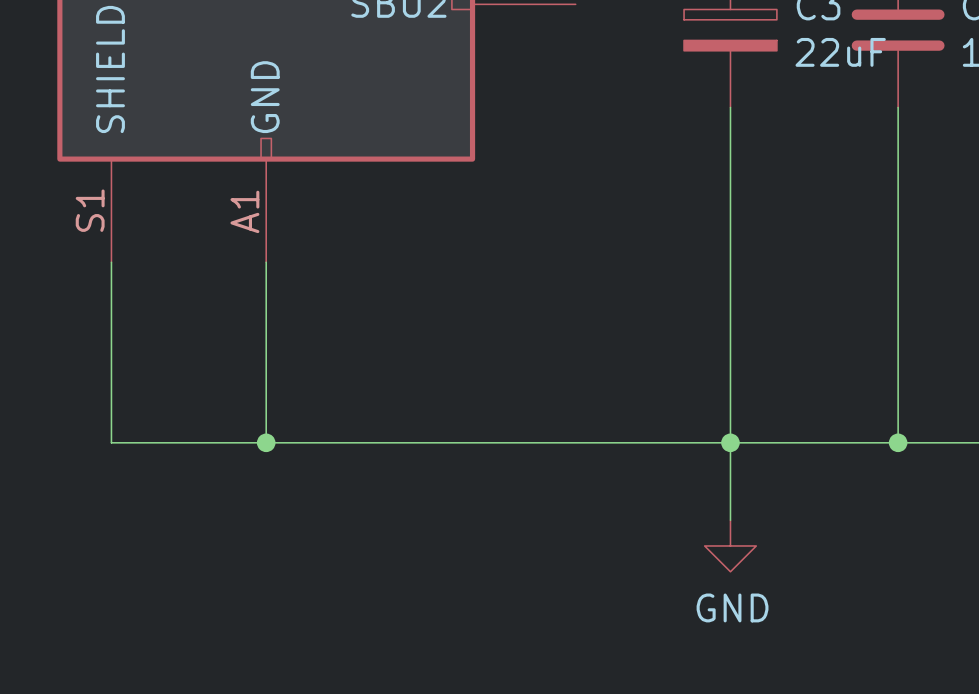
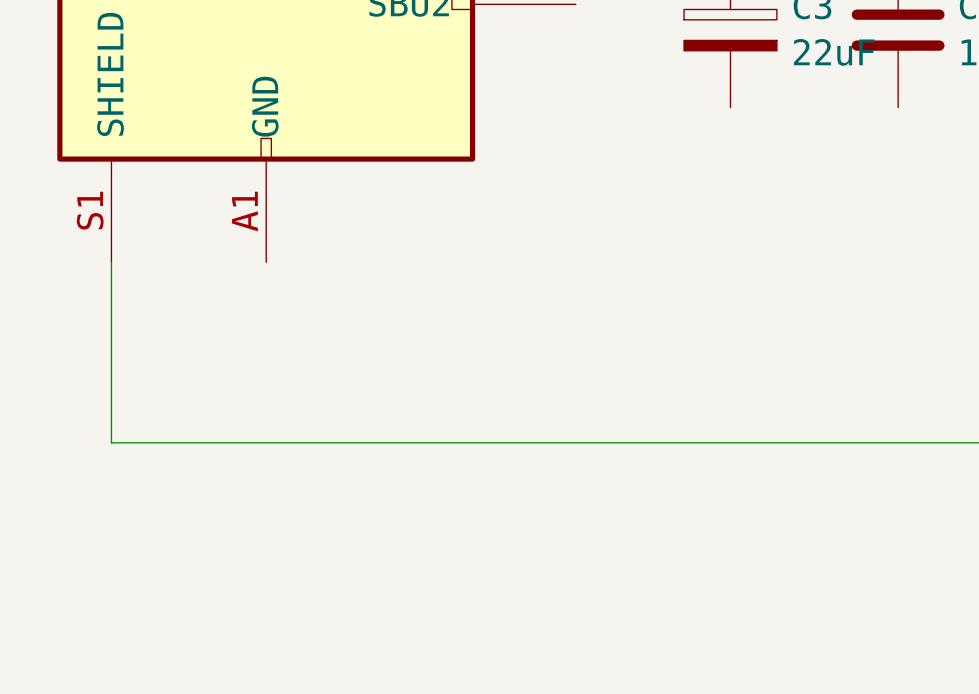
wire: (730, 107) (730, 520) -> none
wire: (898, 107) (898, 442) -> none
wire: (266, 262) (266, 442) -> none
junction: (266, 442) -> none
junction: (730, 442) -> none
junction: (898, 442) -> none
power symbol: GND (730, 545) -> none

